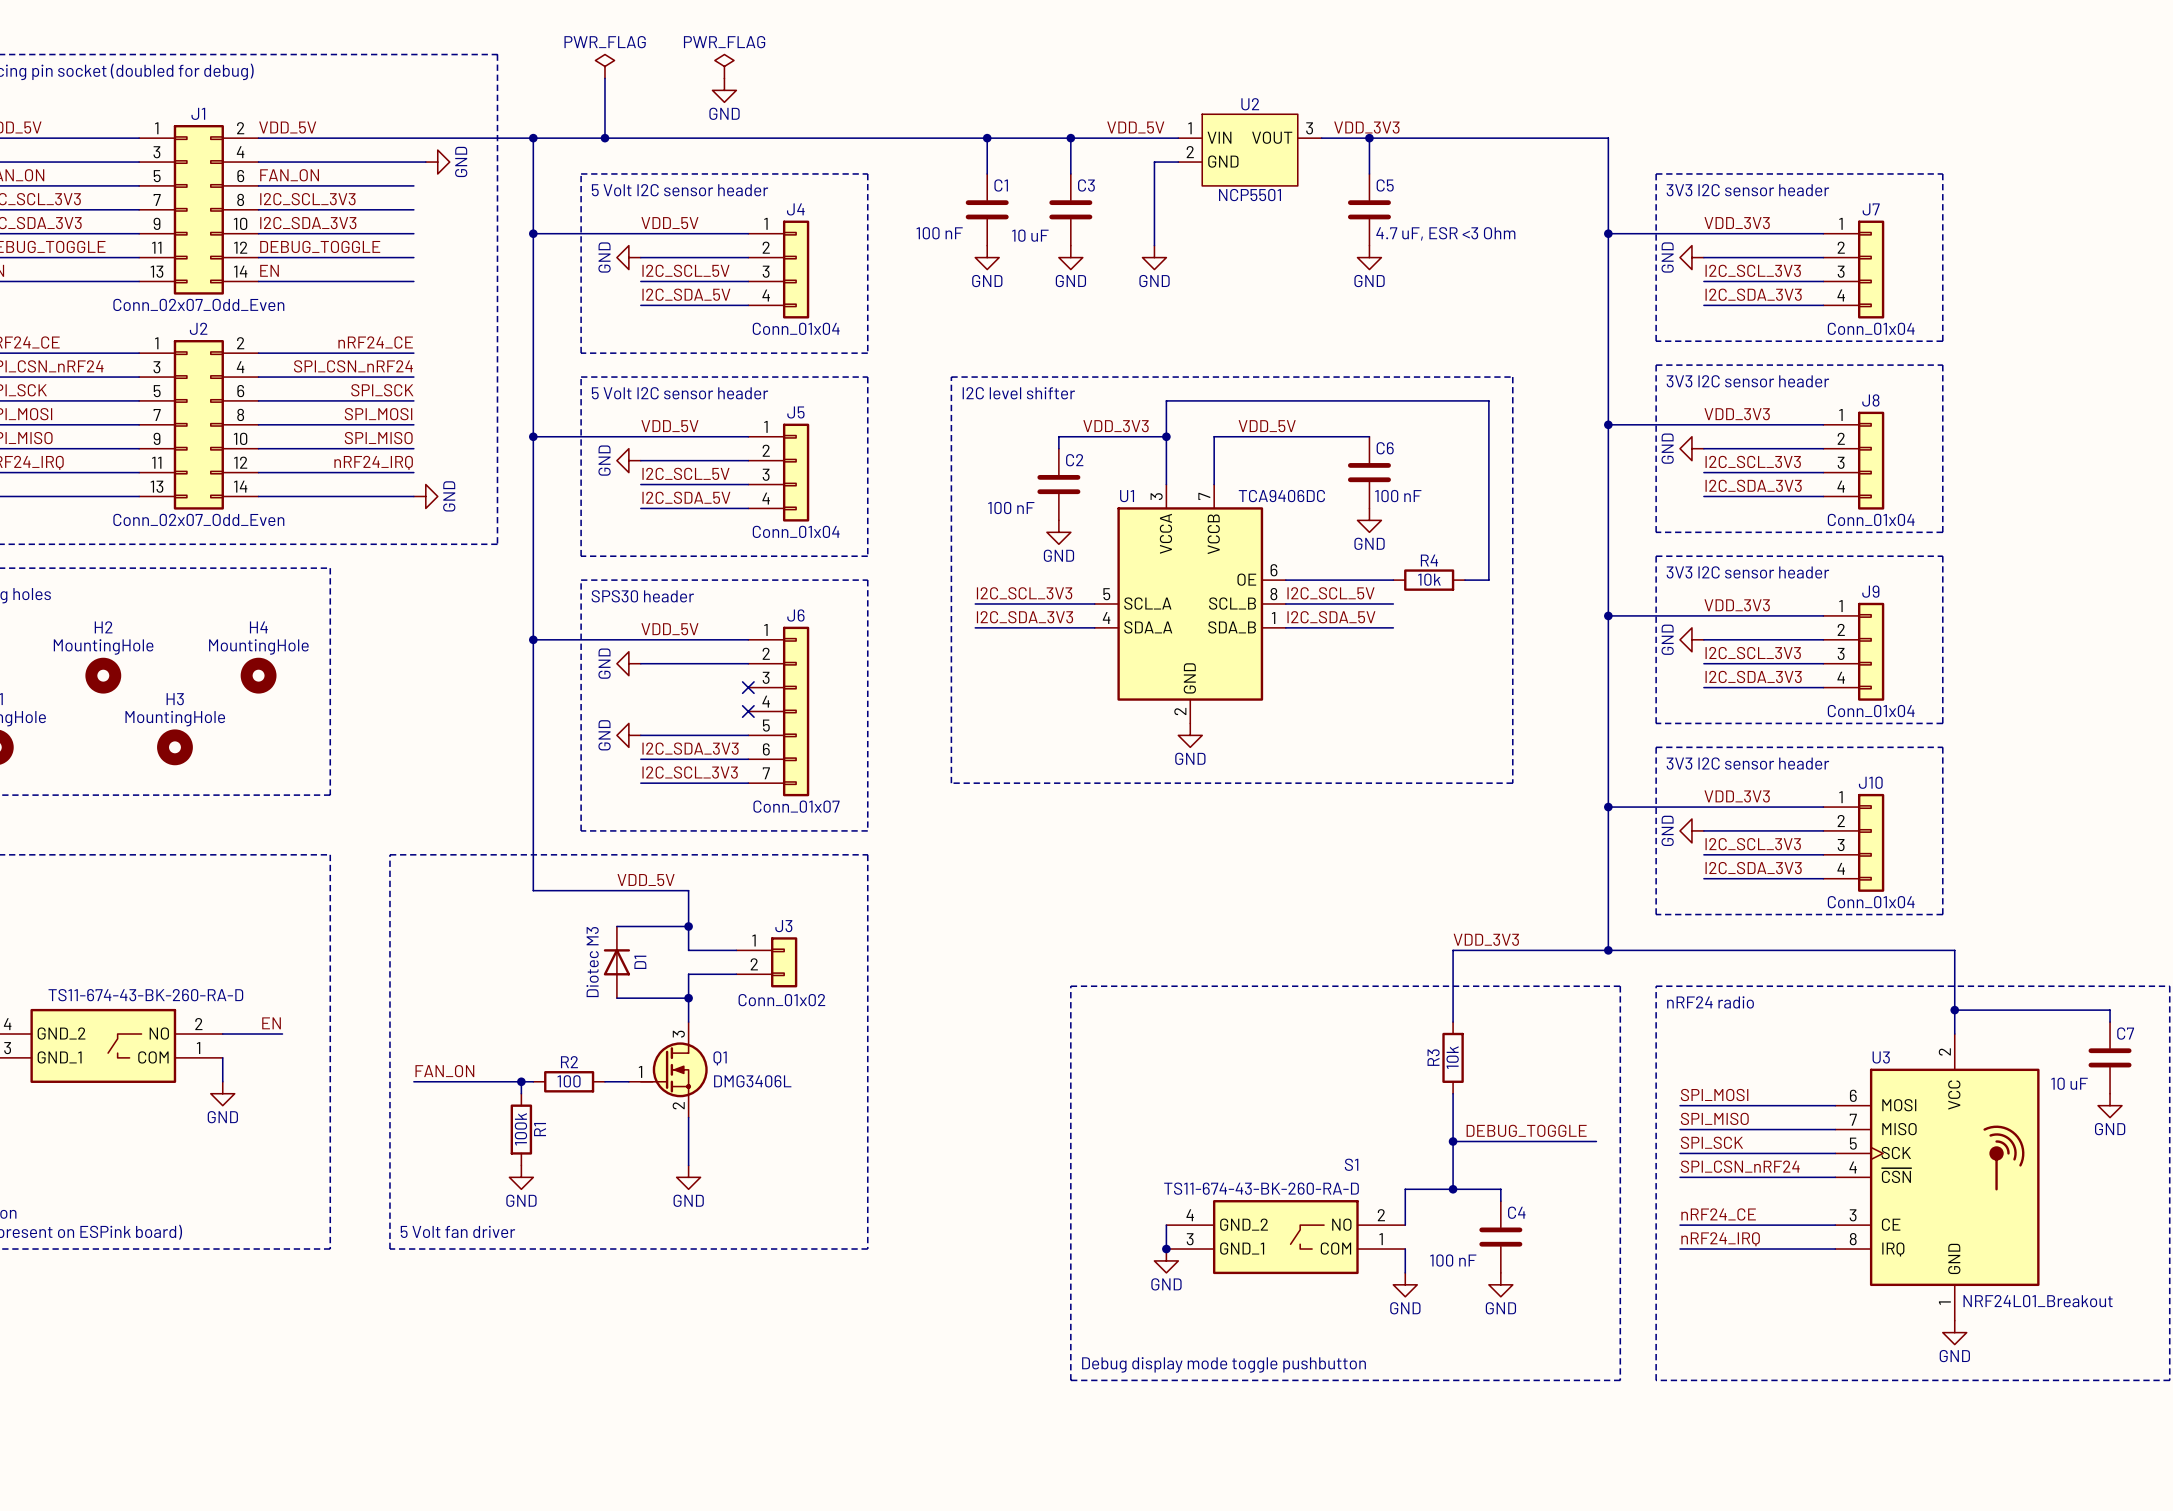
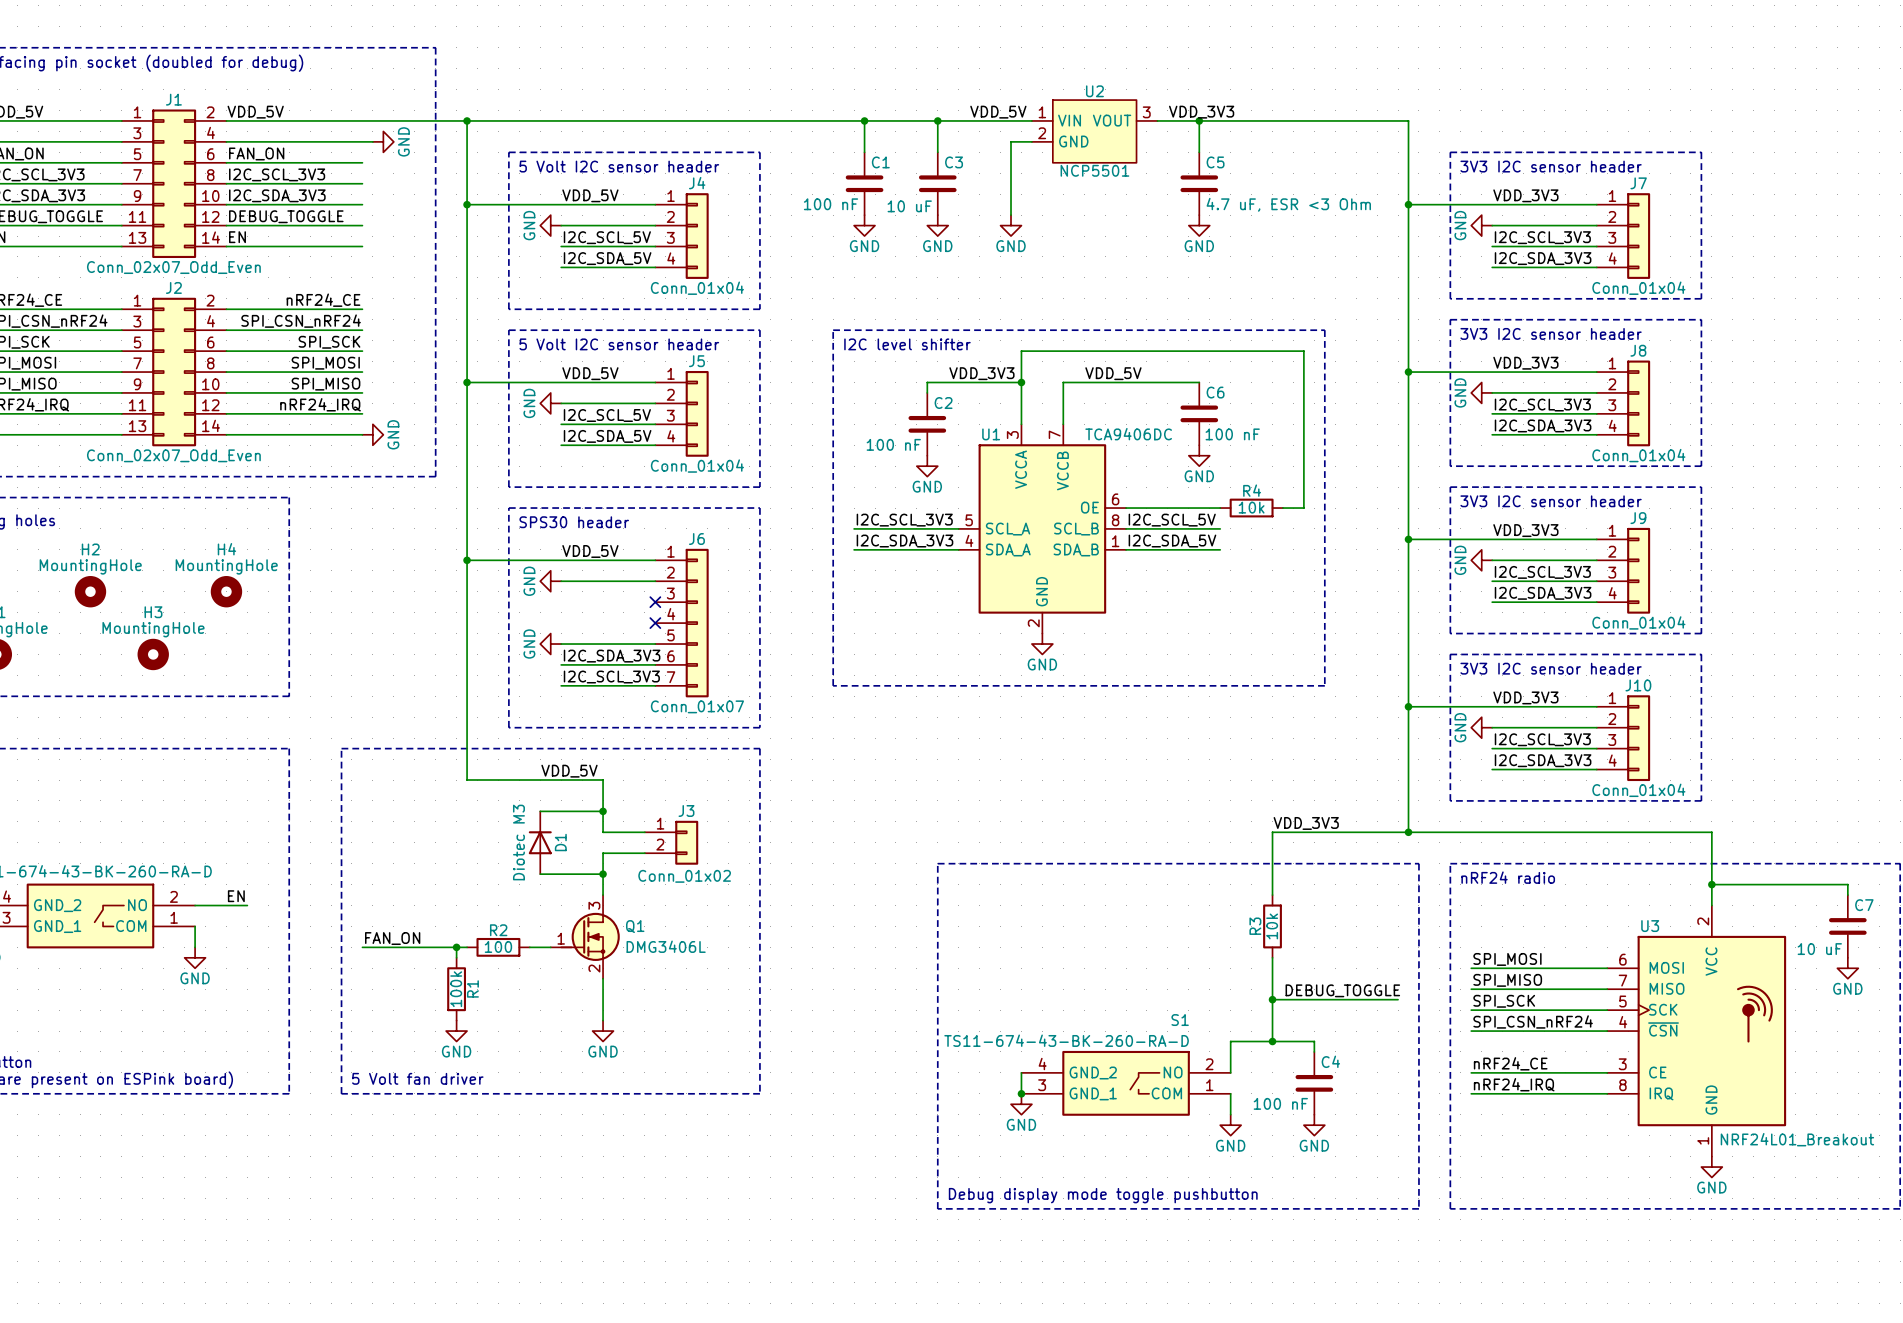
power symbol: PWR_FLAG (604, 66) -> none
power symbol: PWR_FLAG (724, 66) -> none
wire: (604, 78) (604, 138) -> none
power symbol: GND (724, 90) -> none
junction: (604, 138) -> none

